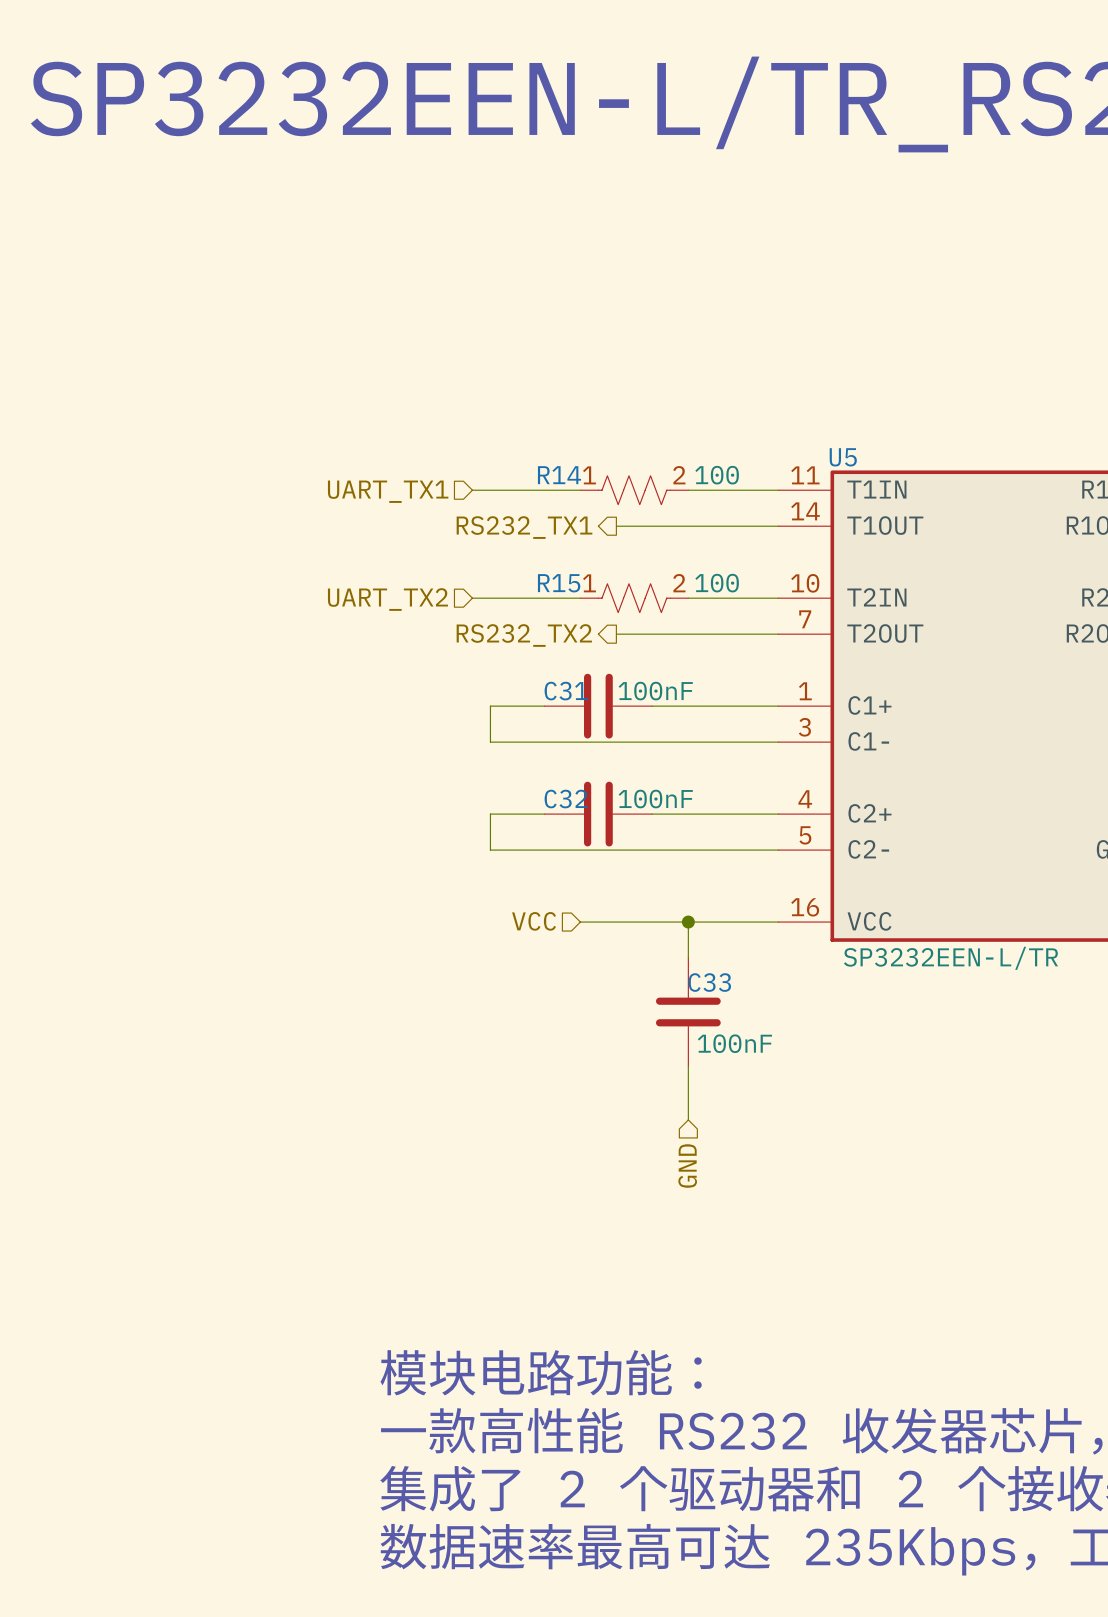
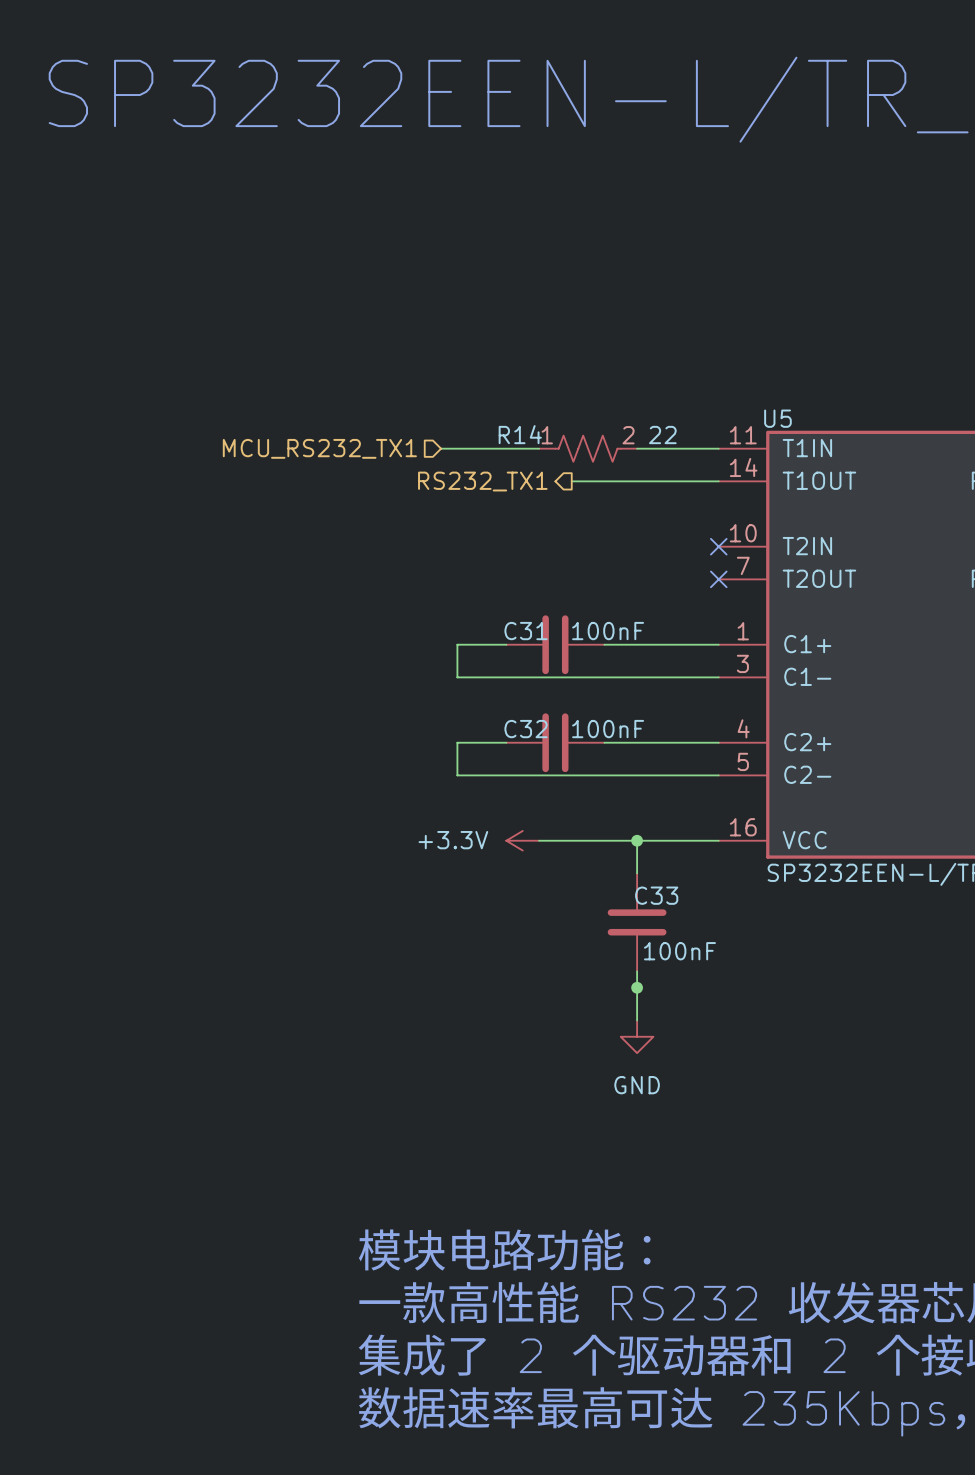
R14 value: 100 (717, 475) -> 22 (662, 435)
hierarchical label: UART_TX1 (388, 491) -> MCU_RS232_TX1 (319, 448)
wire: (472, 598) (580, 598) -> none
R15: 100 (634, 598) -> none
wire: (688, 598) (778, 598) -> none
no-connect mark: none -> (718, 546)
hierarchical label: UART_TX2 (387, 599) -> none
wire: (616, 634) (778, 634) -> none
no-connect mark: none -> (718, 579)
hierarchical label: RS232_TX2 (524, 635) -> none
hierarchical label: VCC (534, 921) -> none
power symbol: none -> +3.3V (522, 840)
junction: none -> (637, 987)
power symbol: none -> GND (637, 1036)
hierarchical label: GND (687, 1166) -> none

